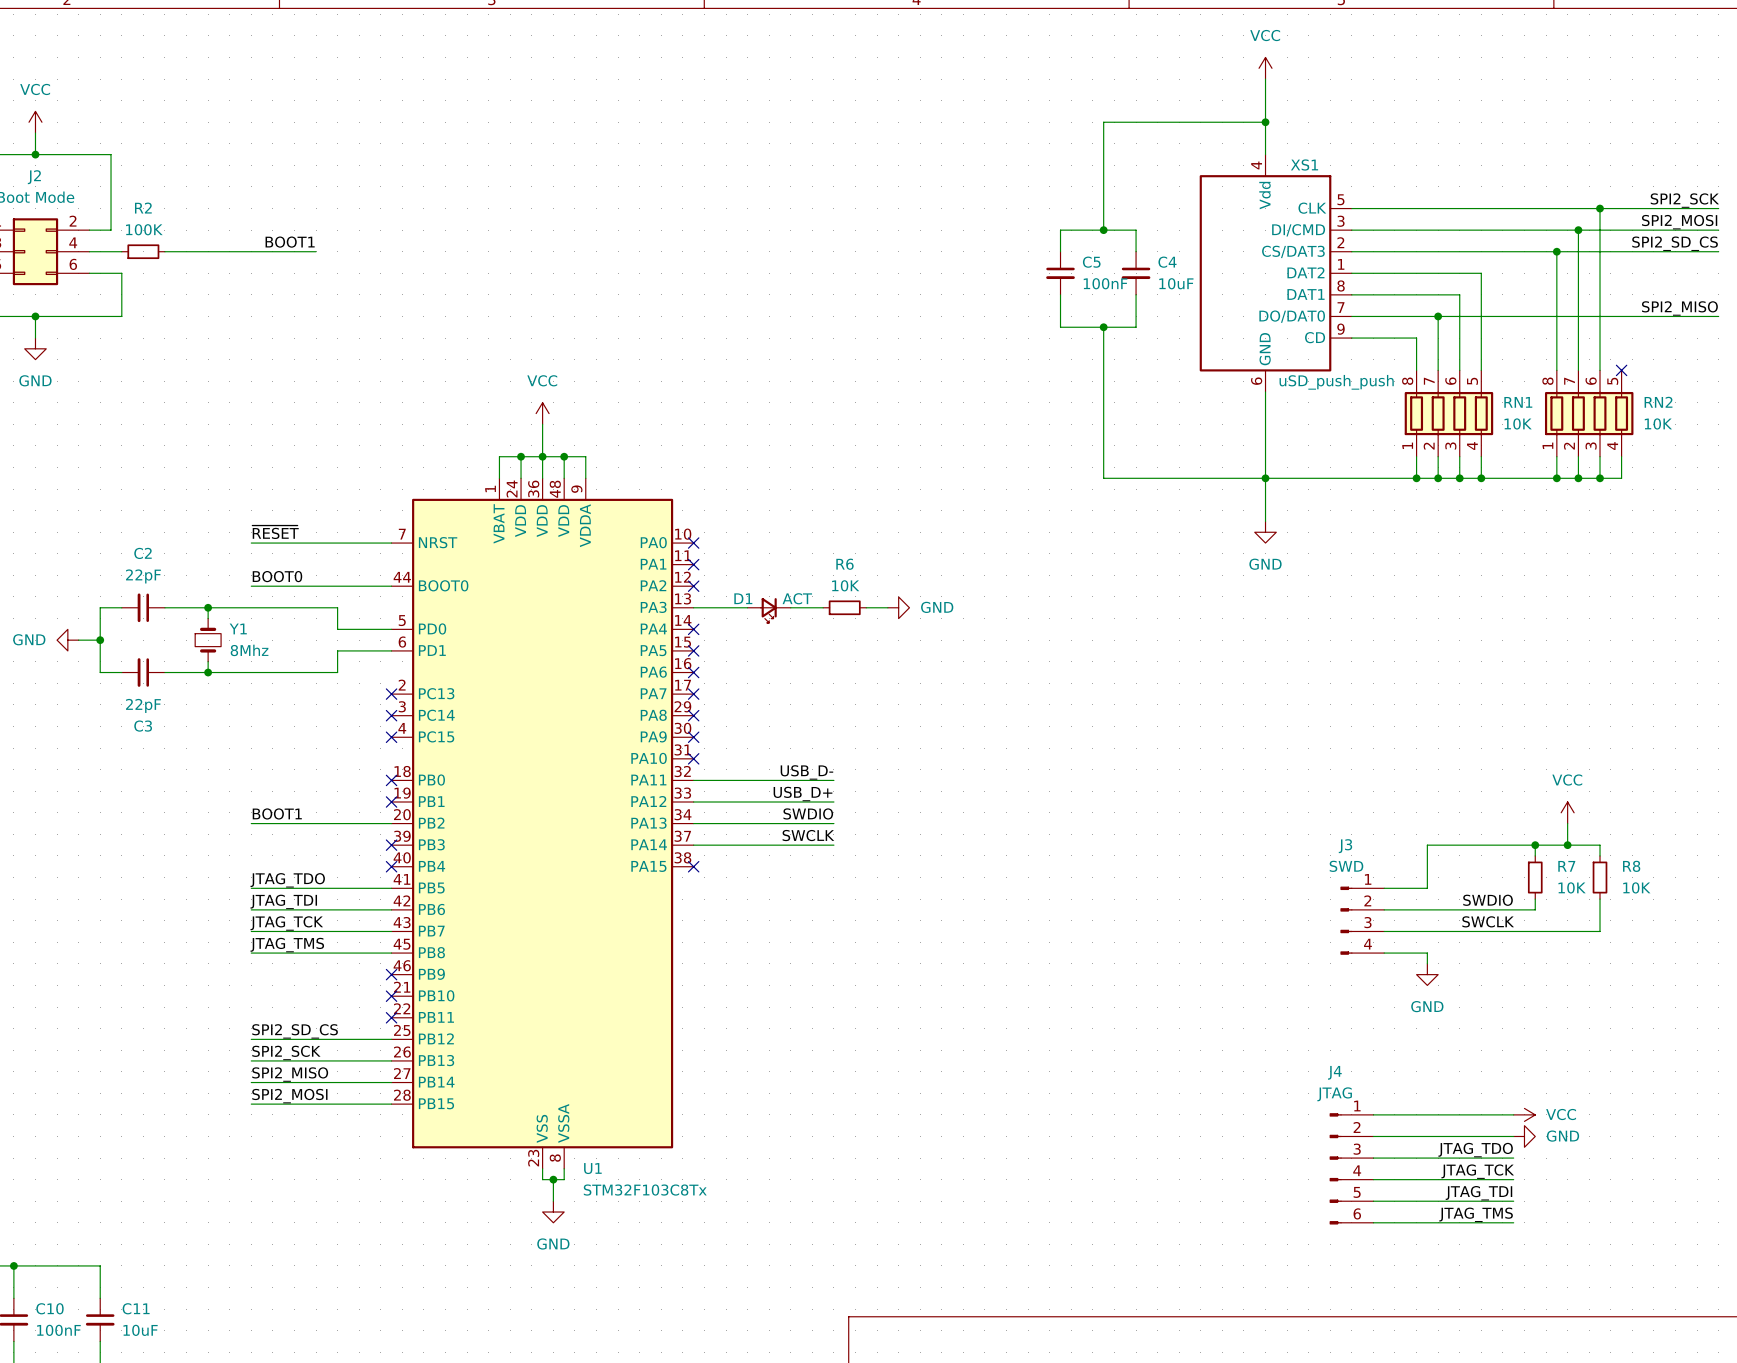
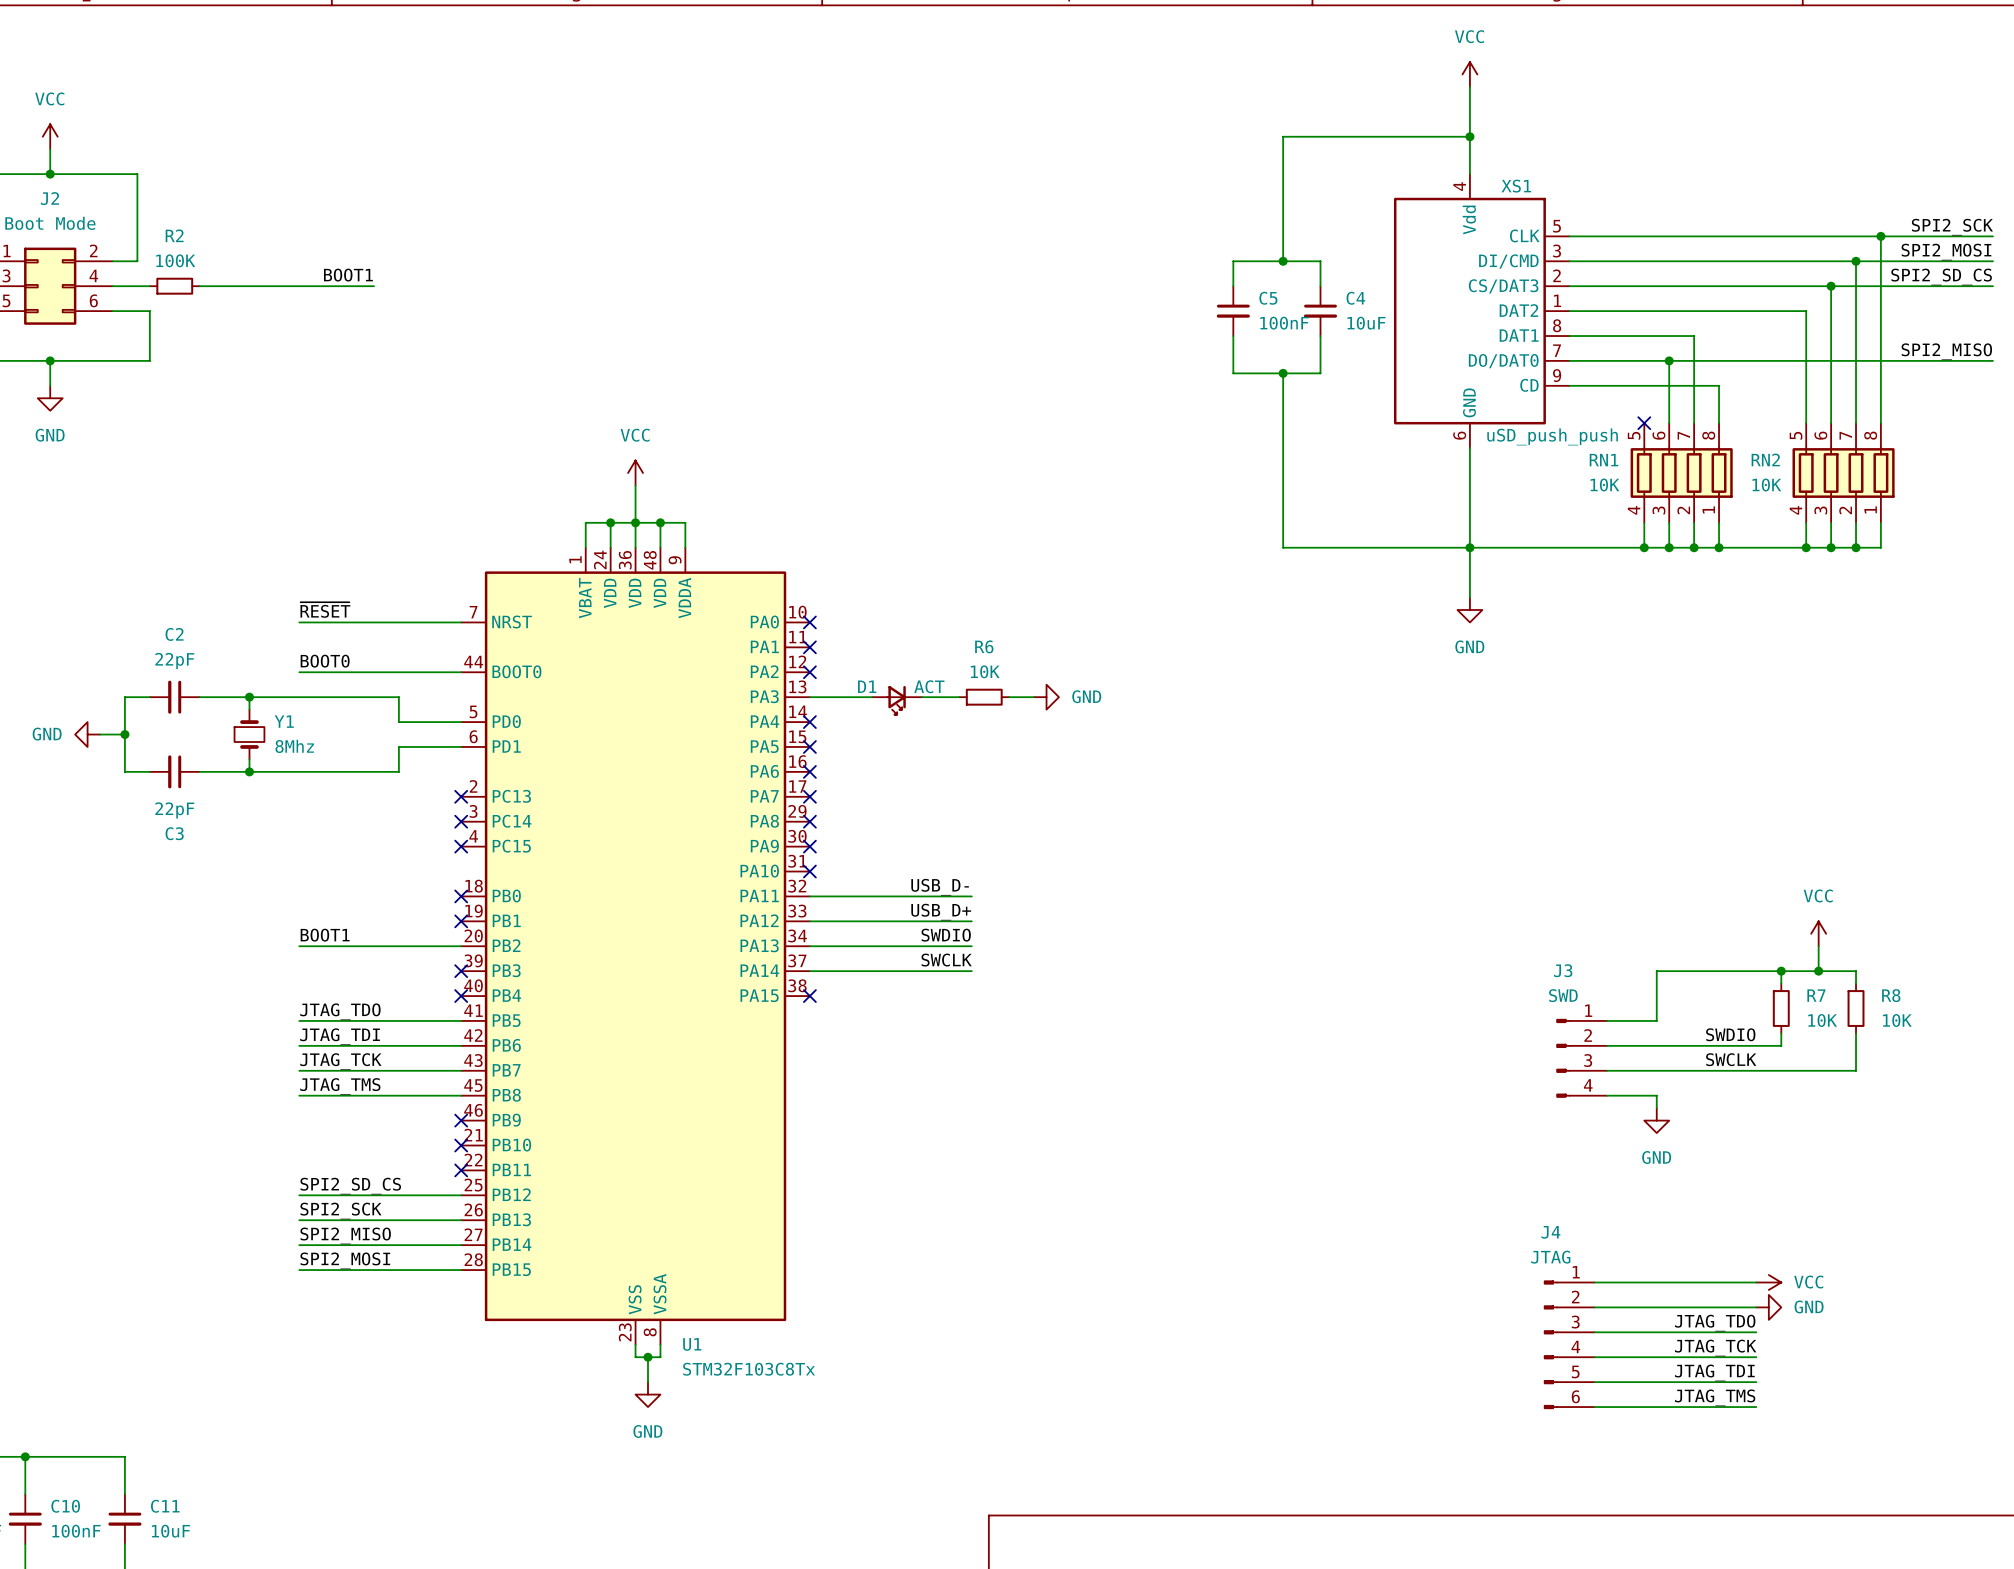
wire: (1600, 208) (1600, 230) -> none
junction: (1600, 208) -> none
wire: none -> (1880, 236) (1880, 423)
junction: none -> (1880, 236)
wire: (1578, 230) (1578, 251) -> none
junction: (1578, 230) -> none
junction: none -> (1856, 261)
wire: (1556, 251) (1556, 273) -> (1719, 311) (1806, 311)
junction: (1556, 251) -> none
junction: none -> (1831, 286)
wire: (1481, 273) (1481, 338) -> none
wire: (1416, 338) (1416, 370) -> (1644, 385) (1719, 385)
no-connect mark: none -> (1644, 423)
no-connect mark: (1621, 370) -> none
RN1 flip: as is (1448, 413) -> left-right (1681, 473)
RN2 flip: as is (1589, 413) -> left-right (1843, 473)

